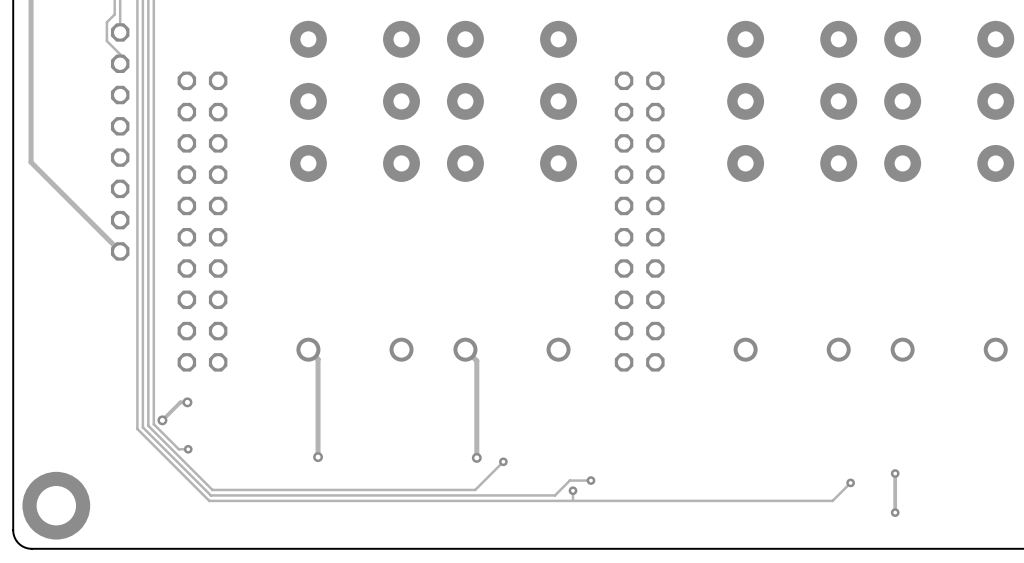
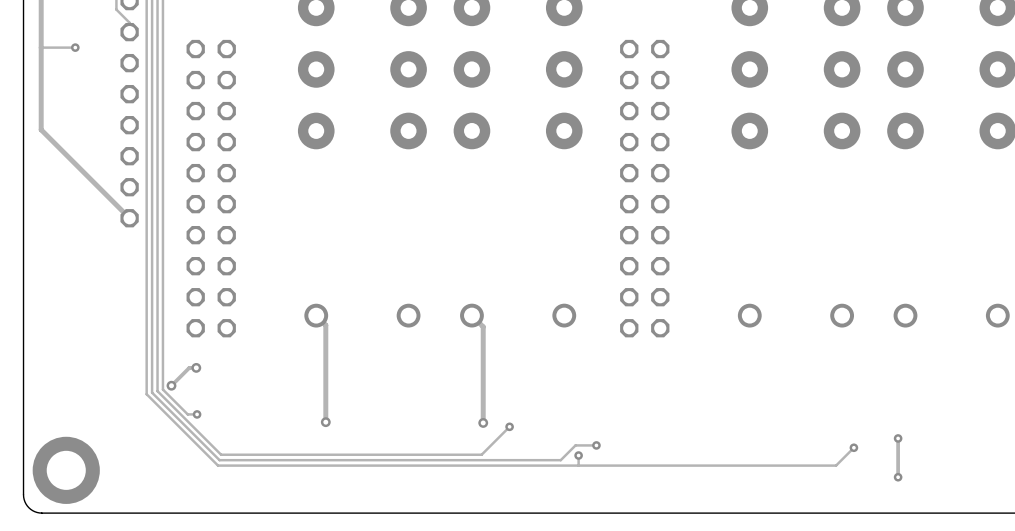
track: none -> (75, 47) (41, 47)
via: none -> (75, 47)

